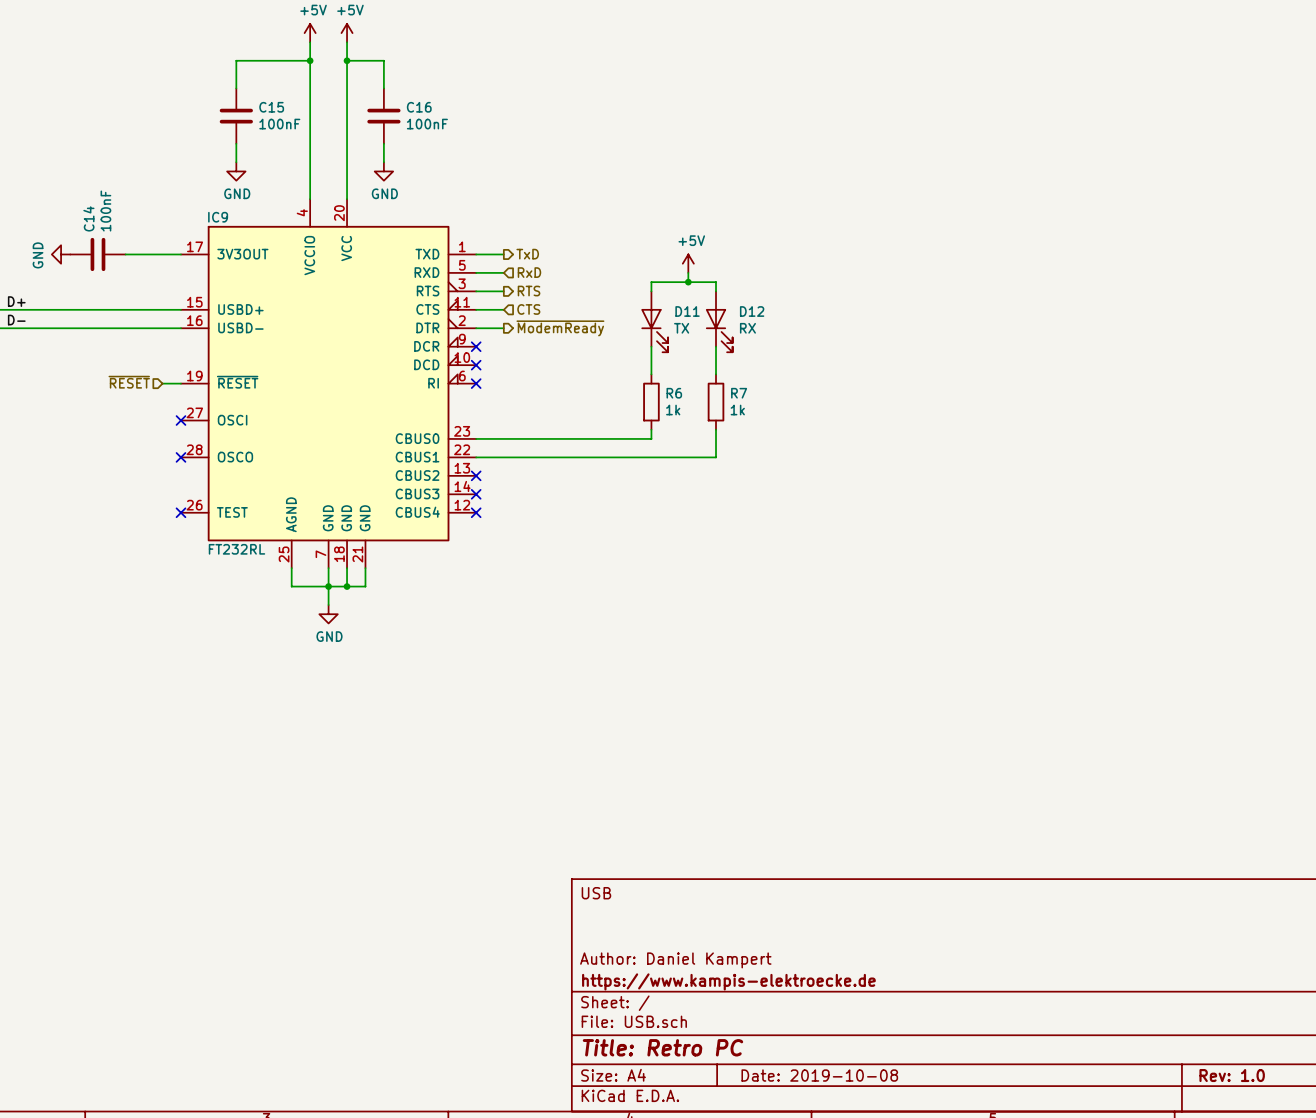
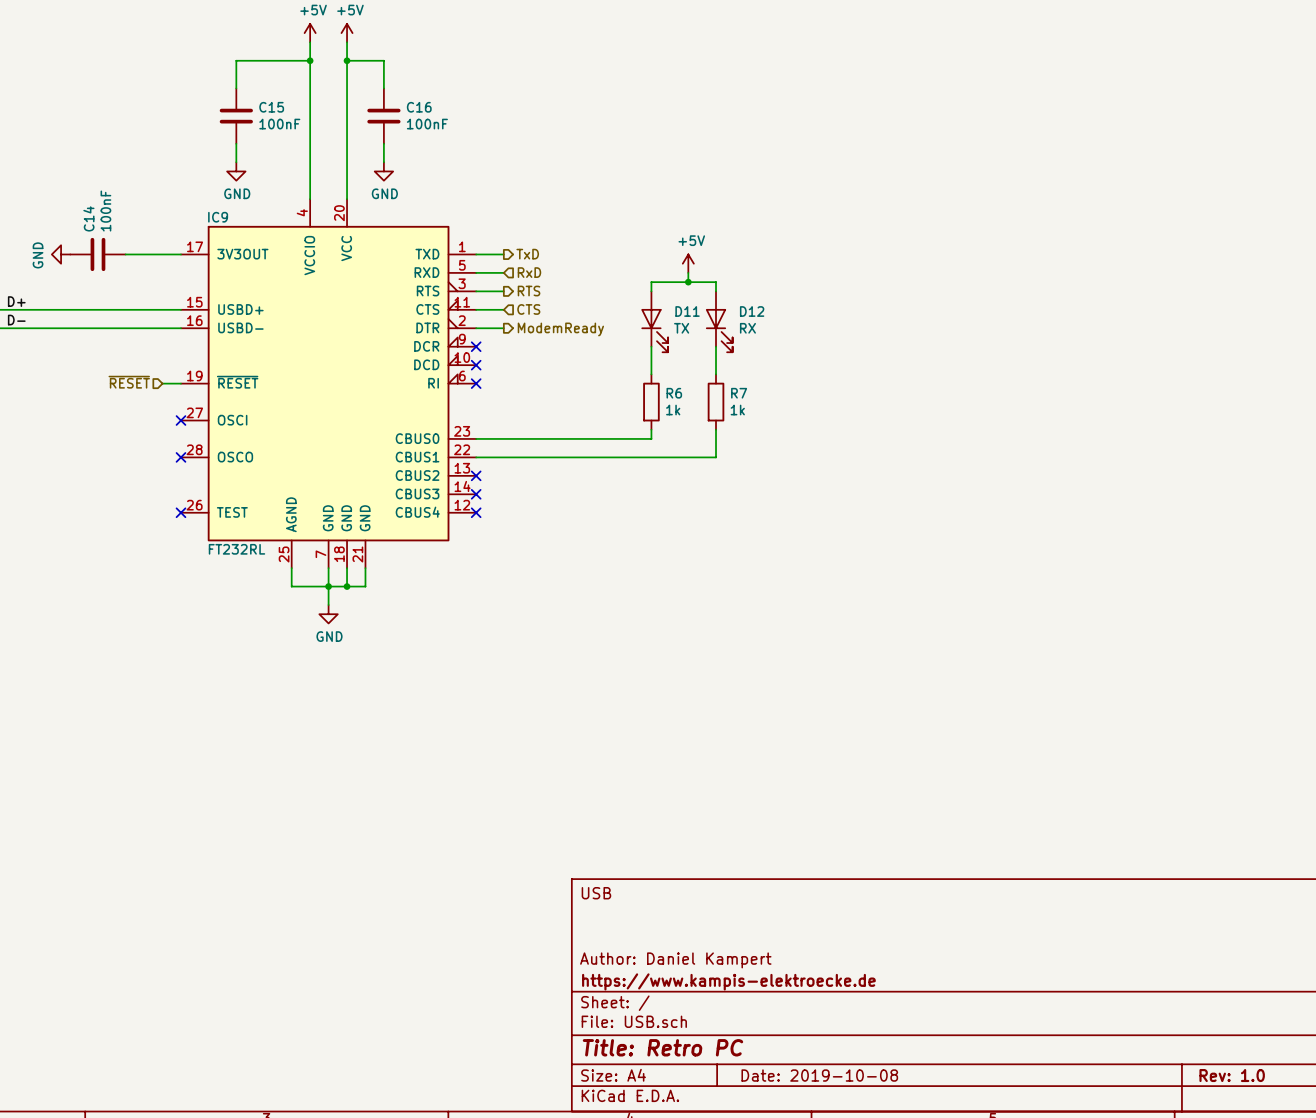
hierarchical label: ~{ModemReady} (560, 328) -> ModemReady (560, 329)

